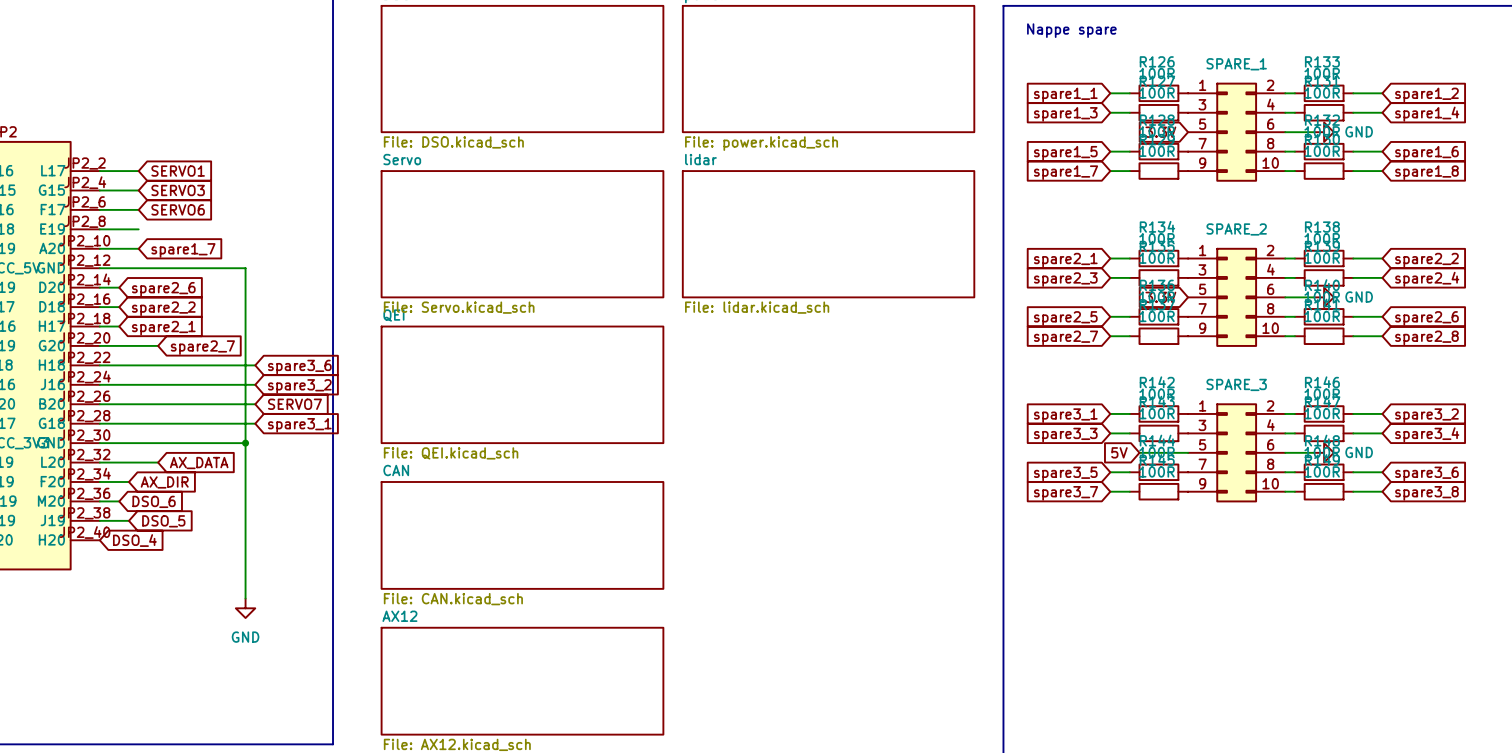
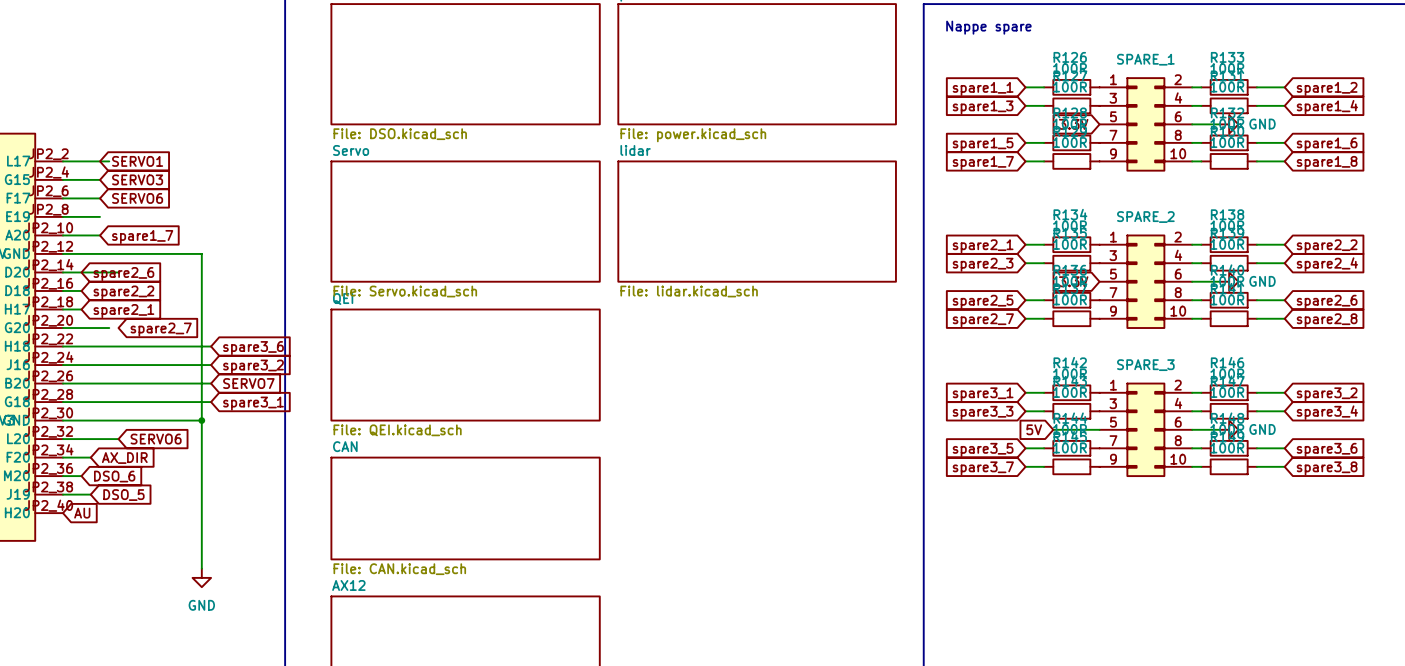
wire: none -> (81, 272) (118, 272)
wire: (148, 345) (158, 345) -> (100, 161) (109, 161)
global label: AX_DATA (199, 463) -> SERVO6 (156, 439)
global label: DSO_4 (134, 540) -> AU (82, 513)

